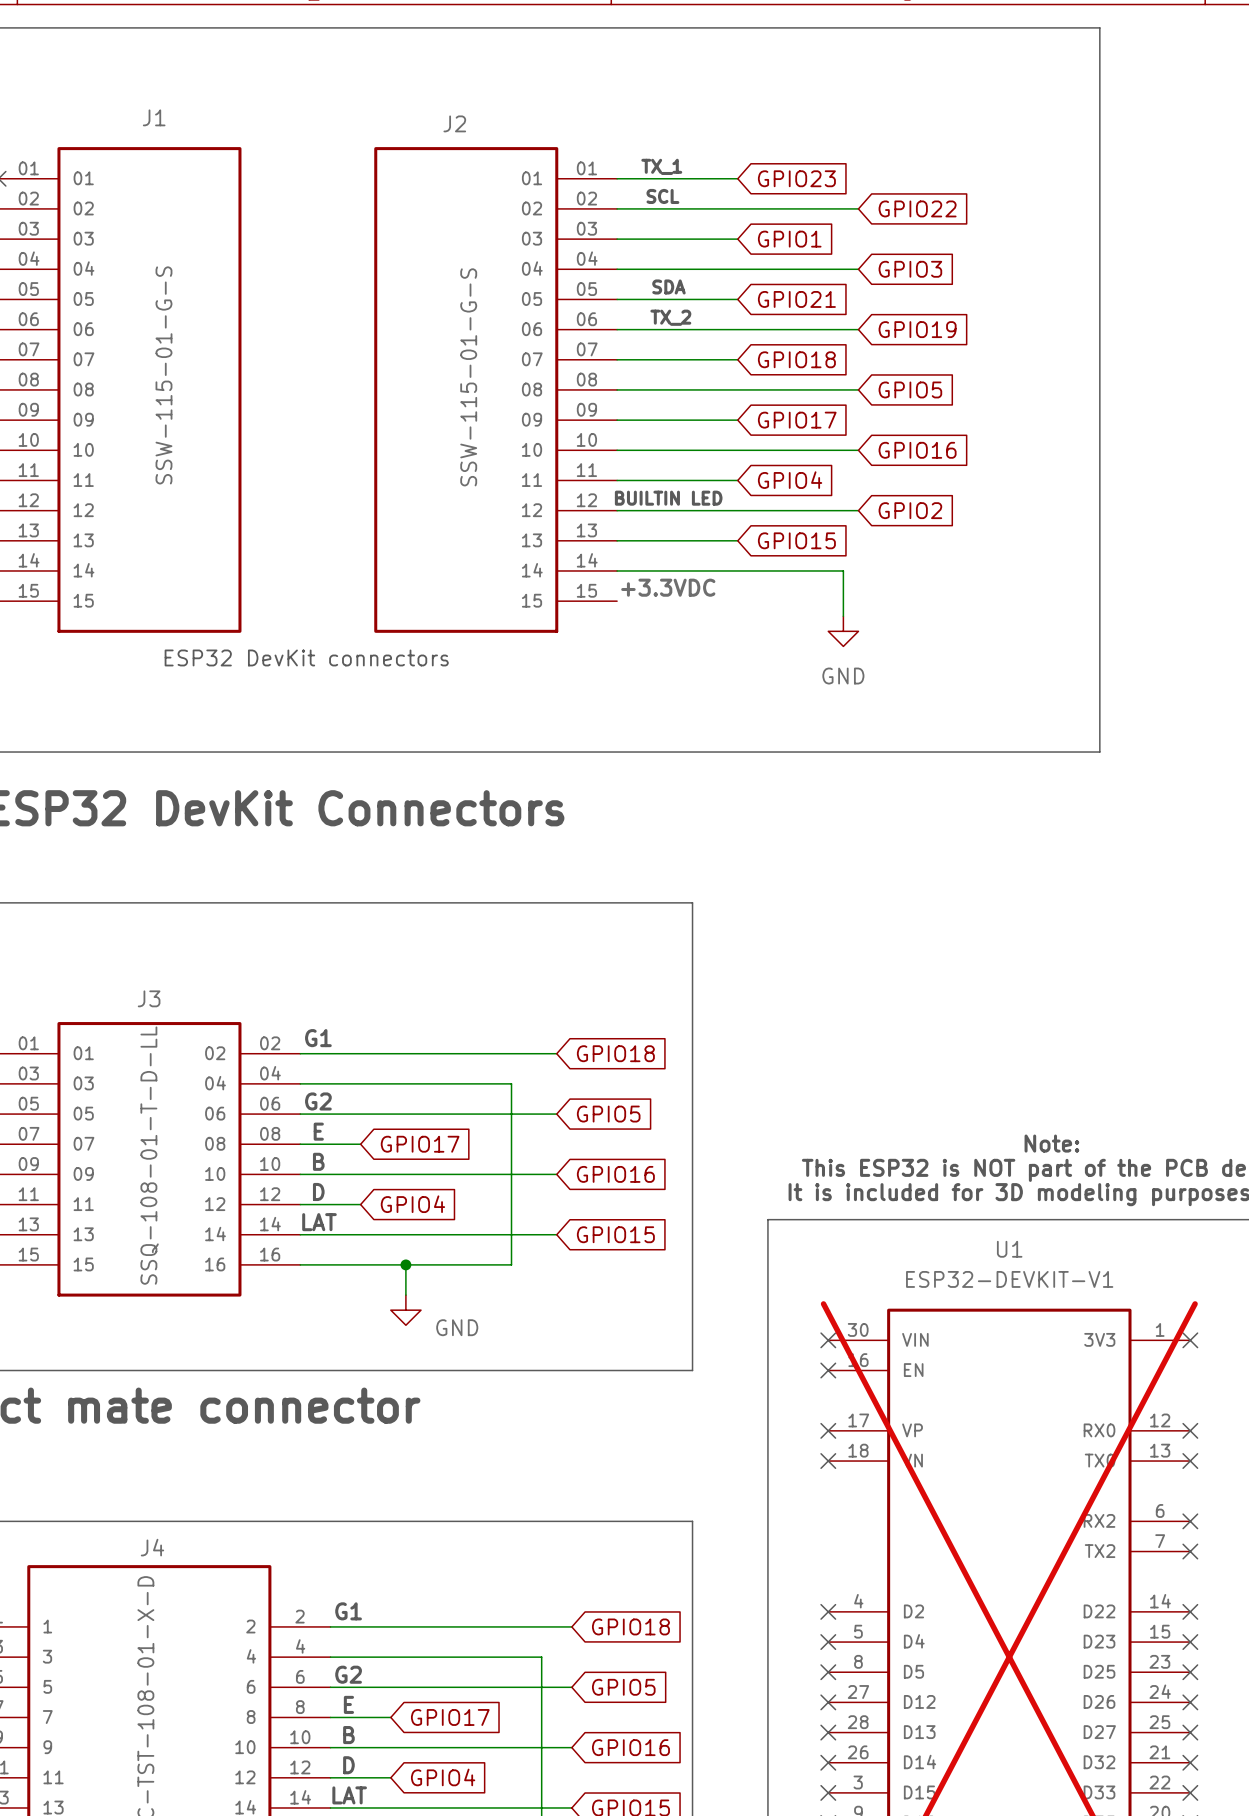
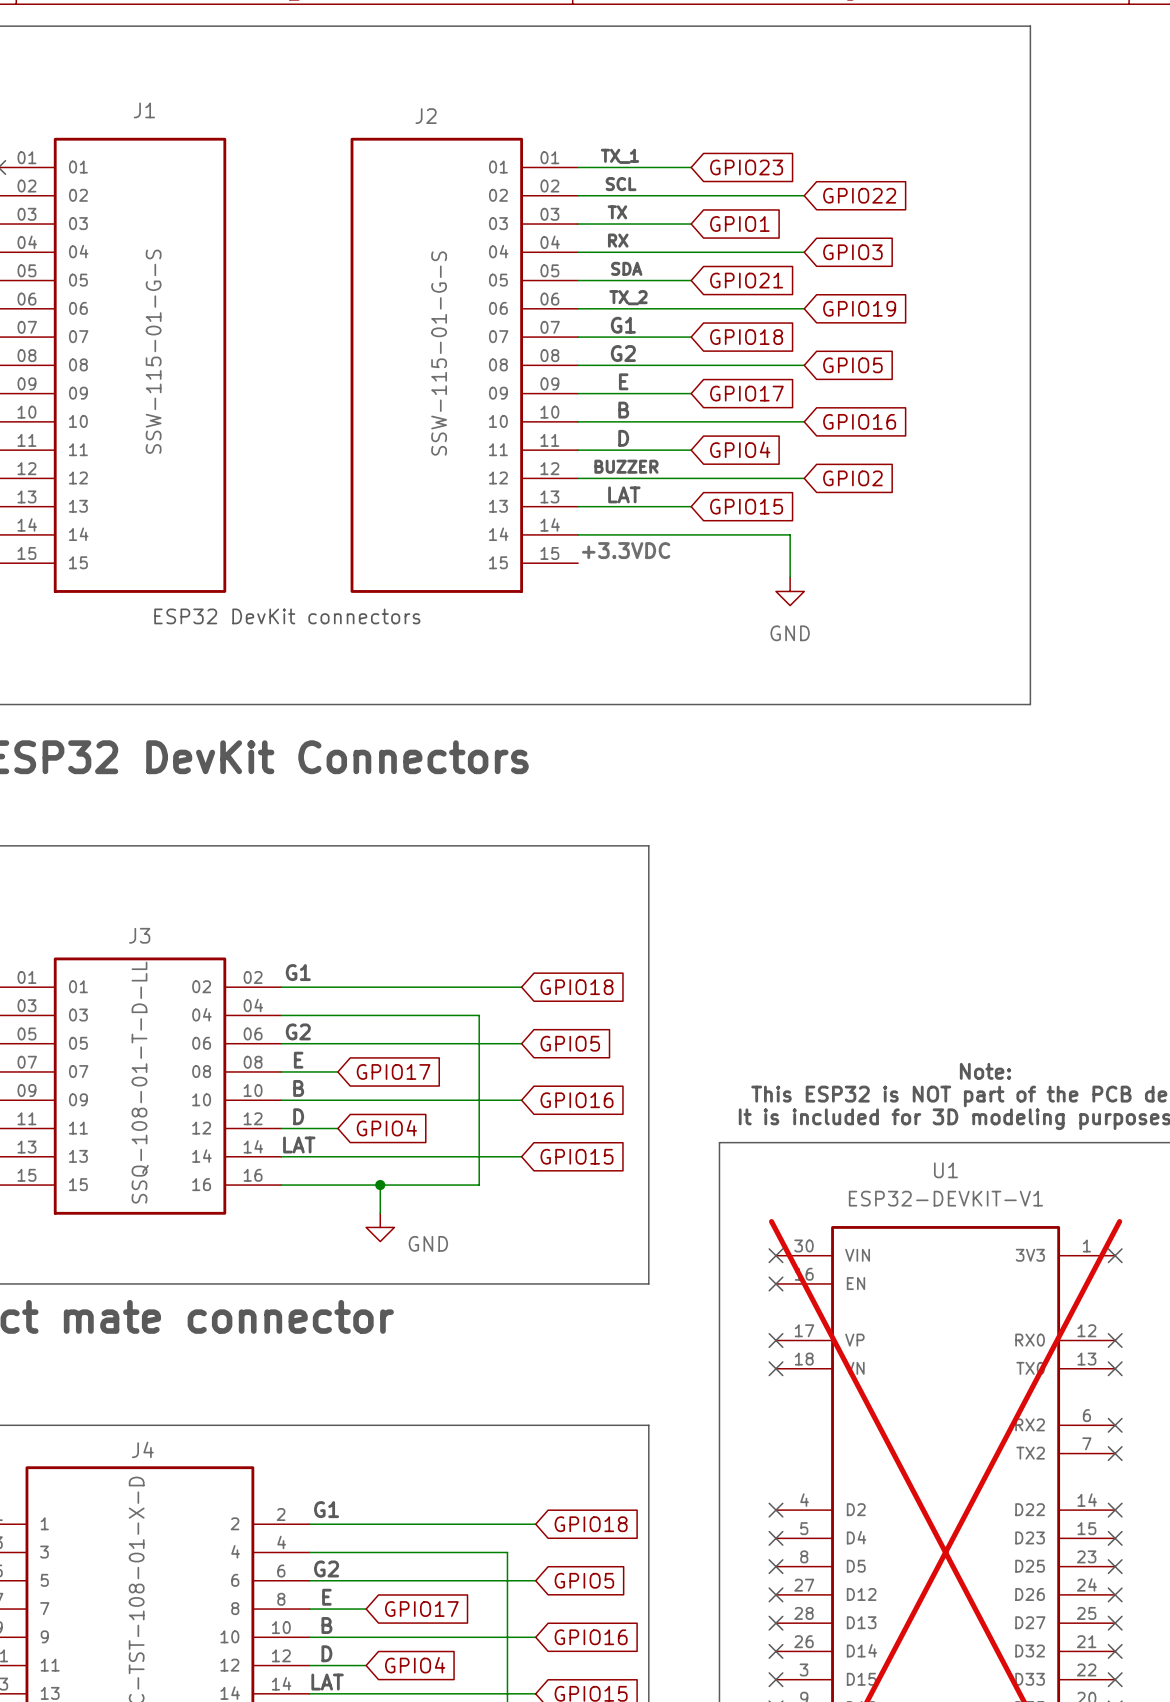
text: none -> TX (617, 212)
text: none -> RX (618, 240)
text: none -> G1 (623, 325)
text: none -> G2 (623, 353)
text: none -> E (623, 381)
text: none -> B (623, 410)
text: none -> D (623, 438)
text: BUILTIN LED (668, 498) -> BUZZER (626, 466)
text: none -> LAT (624, 494)

